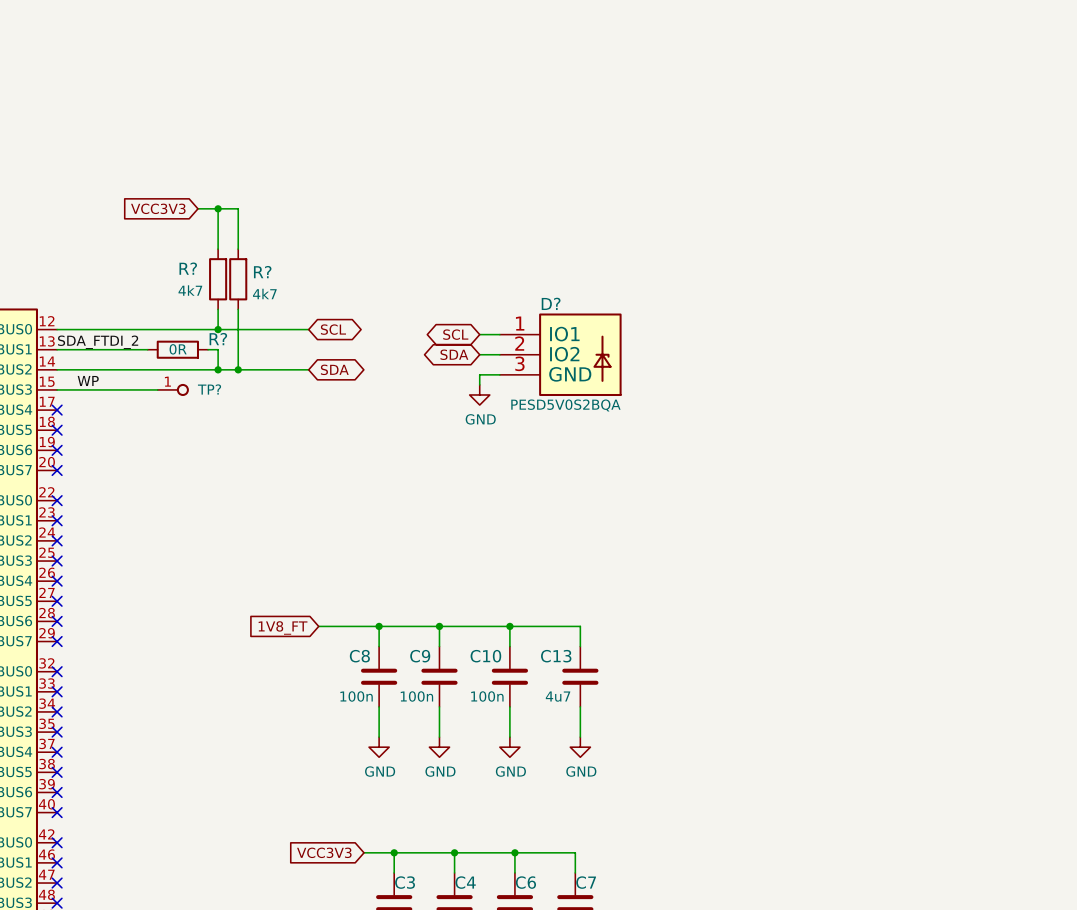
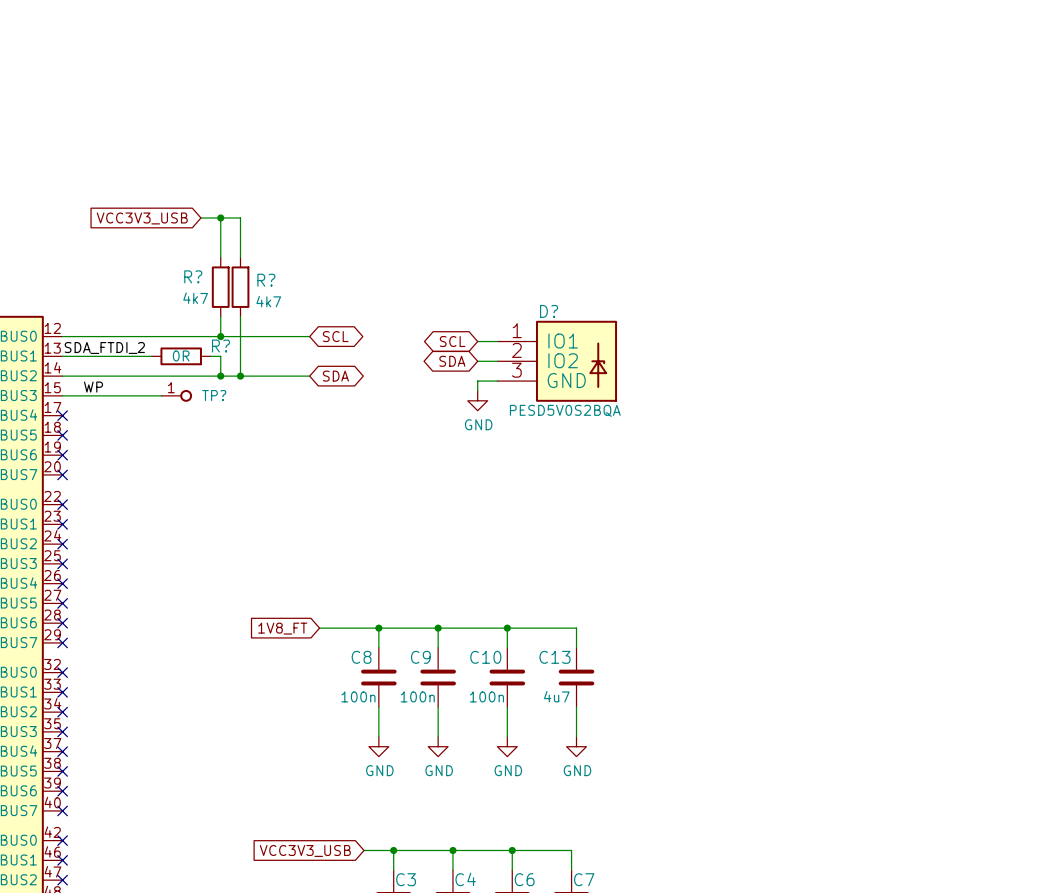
global label: VCC3V3 (158, 208) -> VCC3V3_USB (142, 218)
global label: VCC3V3 (324, 852) -> VCC3V3_USB (305, 850)

